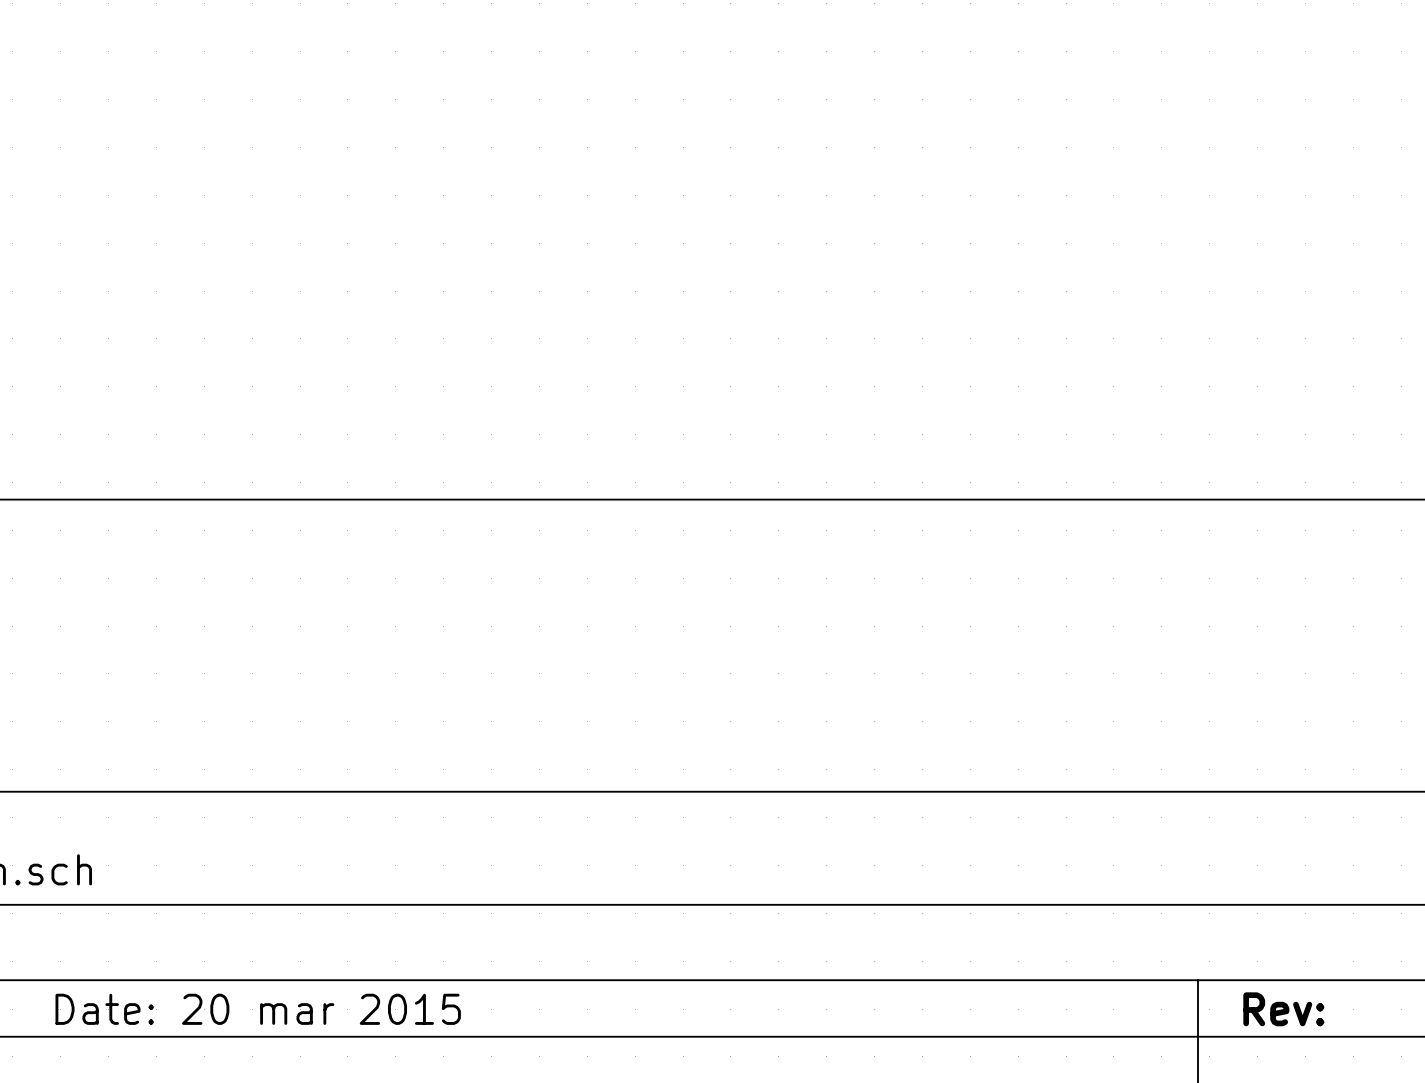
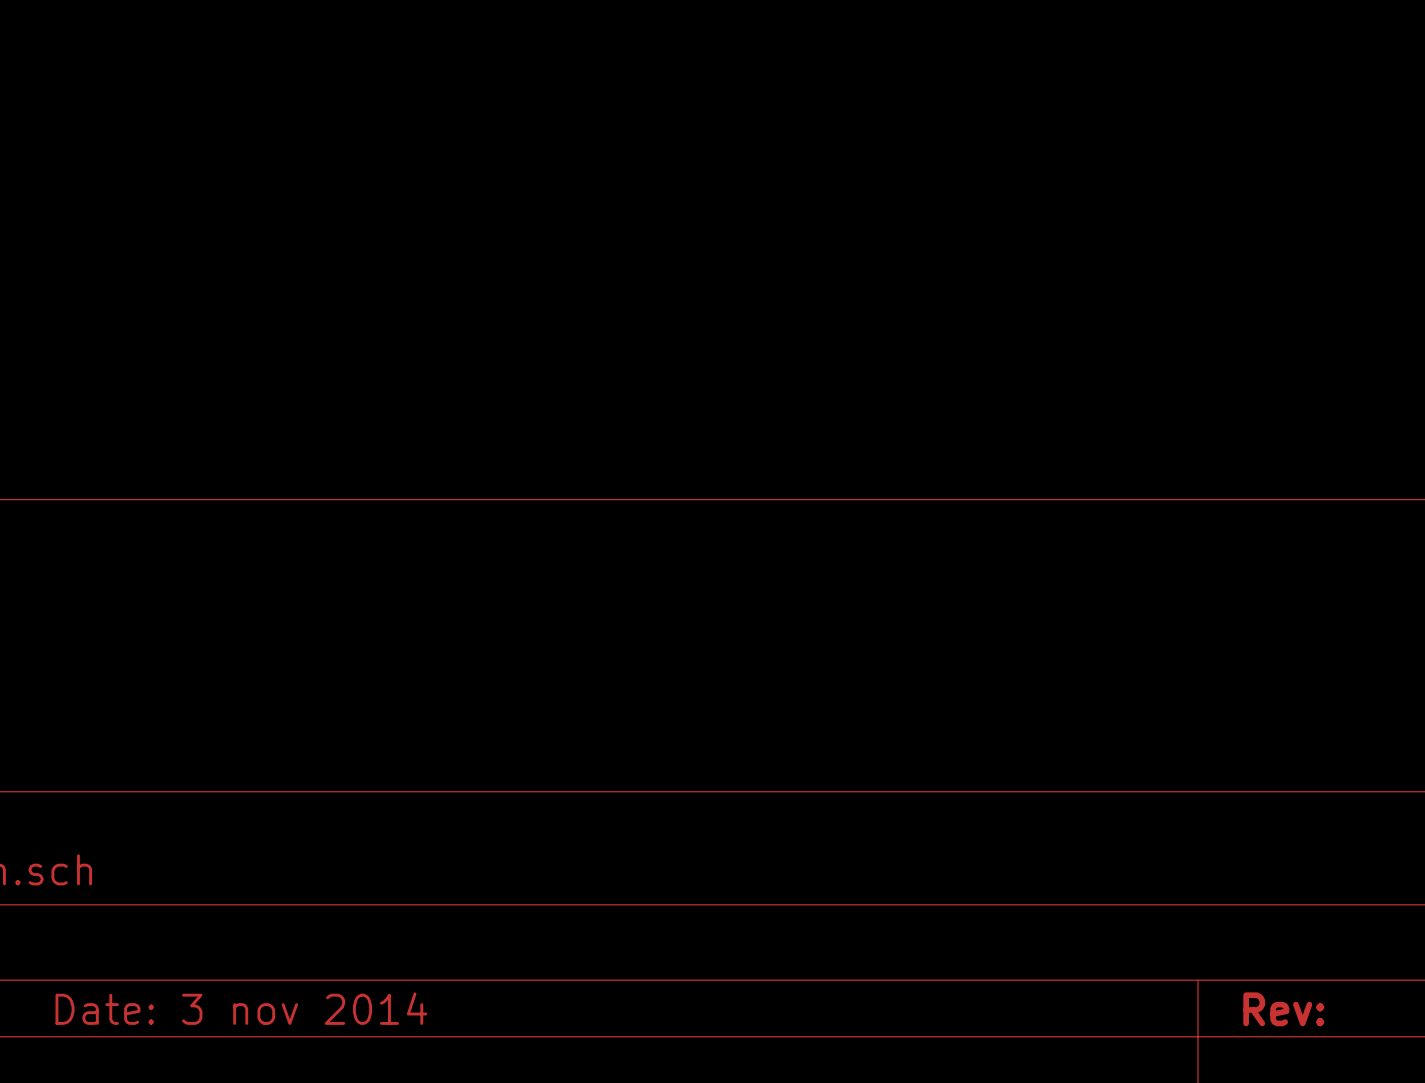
title block: Date: 20 mar 2015 (258, 1009) -> Date: 3 nov 2014 (241, 1008)

